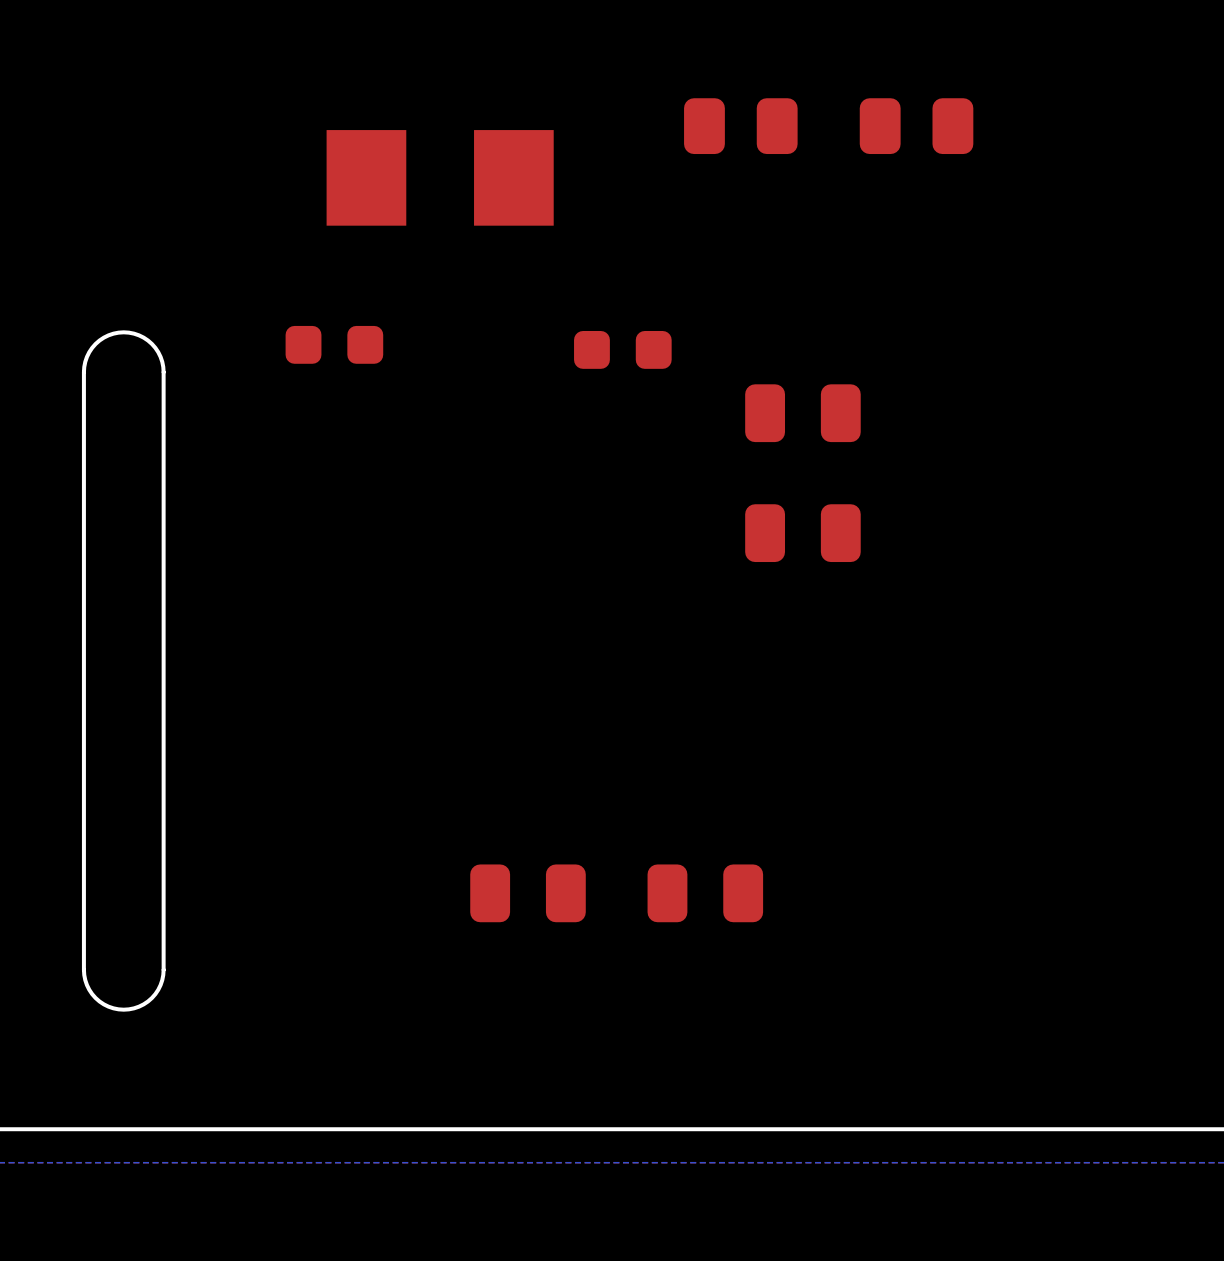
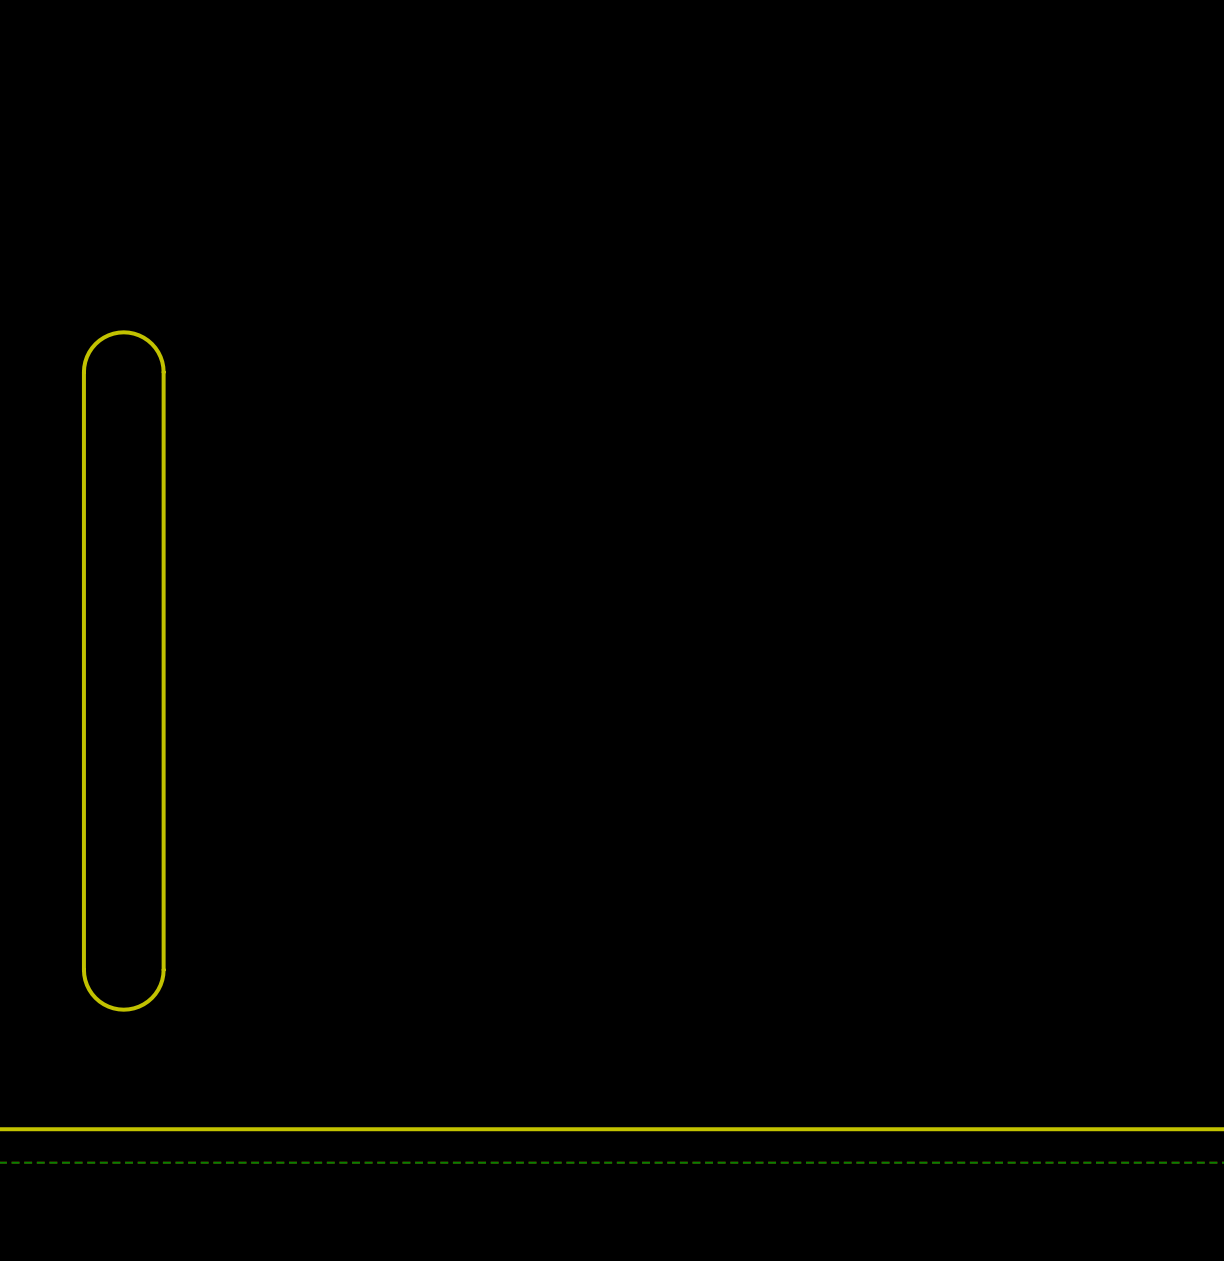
part: (740, 126) -> none
part: (916, 126) -> none
part: (440, 177) -> none
part: (334, 344) -> none
part: (622, 349) -> none
part: (802, 413) -> none
part: (802, 533) -> none
part: (528, 893) -> none
part: (705, 893) -> none

